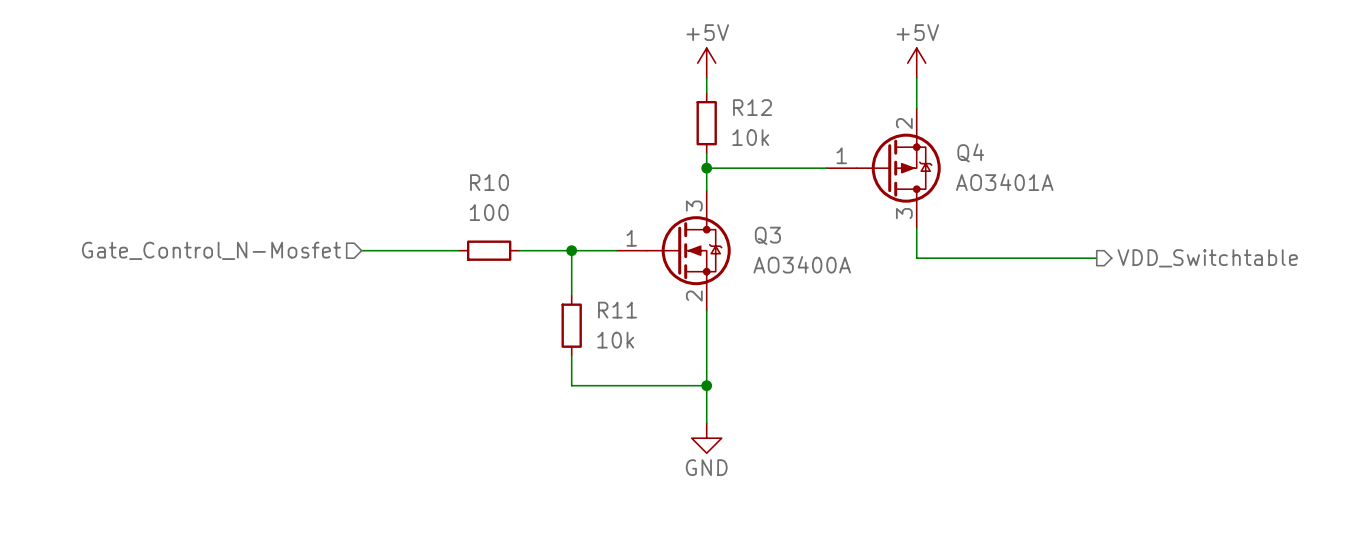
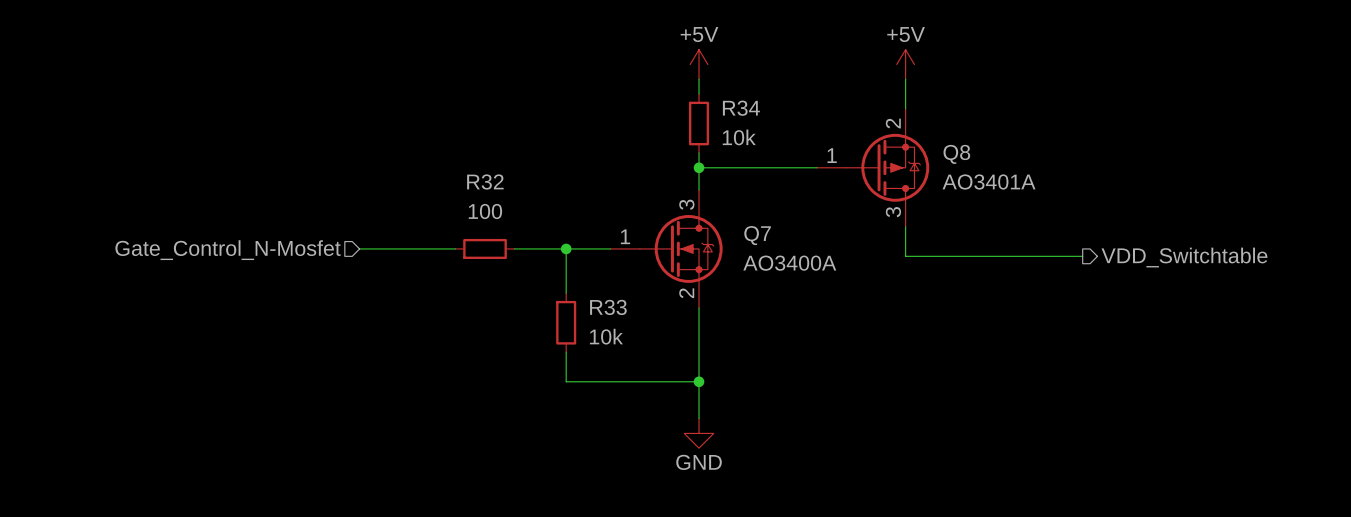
R12 name: R12 (752, 107) -> R34 (741, 108)
Q4 name: Q4 (970, 152) -> Q8 (956, 154)
R10 name: R10 (489, 182) -> R32 (485, 181)
Q3 name: Q3 (767, 235) -> Q7 (757, 235)
R11 name: R11 (617, 310) -> R33 (608, 307)

